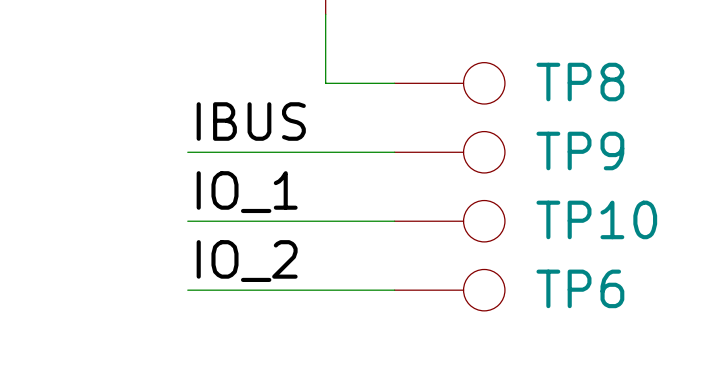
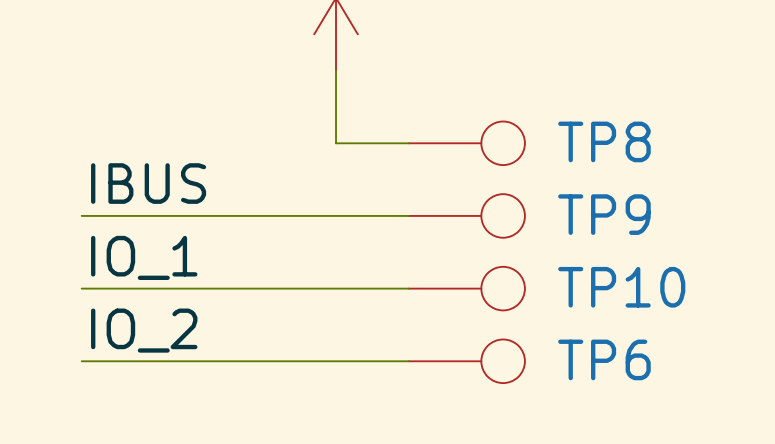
label position: IBUS (251, 121) -> IBUS (148, 183)
wire: none -> (81, 215) (190, 215)
label position: IO_1 (247, 192) -> IO_1 (144, 257)
wire: none -> (81, 288) (190, 288)
label position: IO_2 (247, 261) -> IO_2 (144, 330)
wire: none -> (81, 361) (190, 361)

